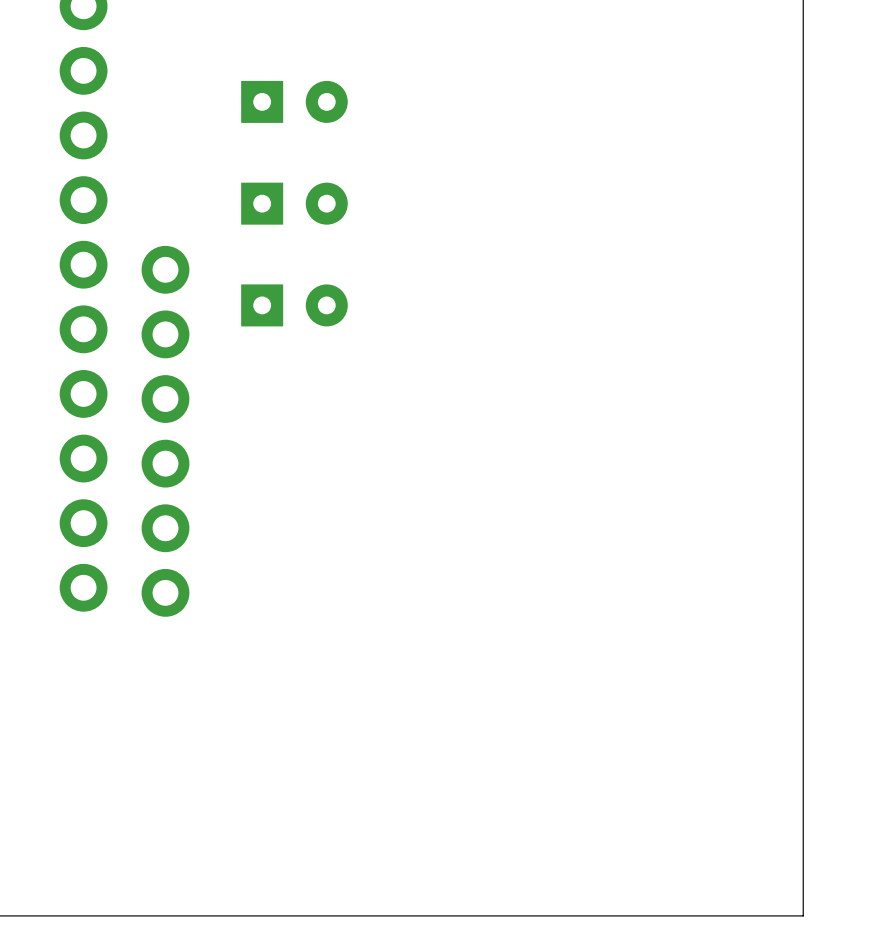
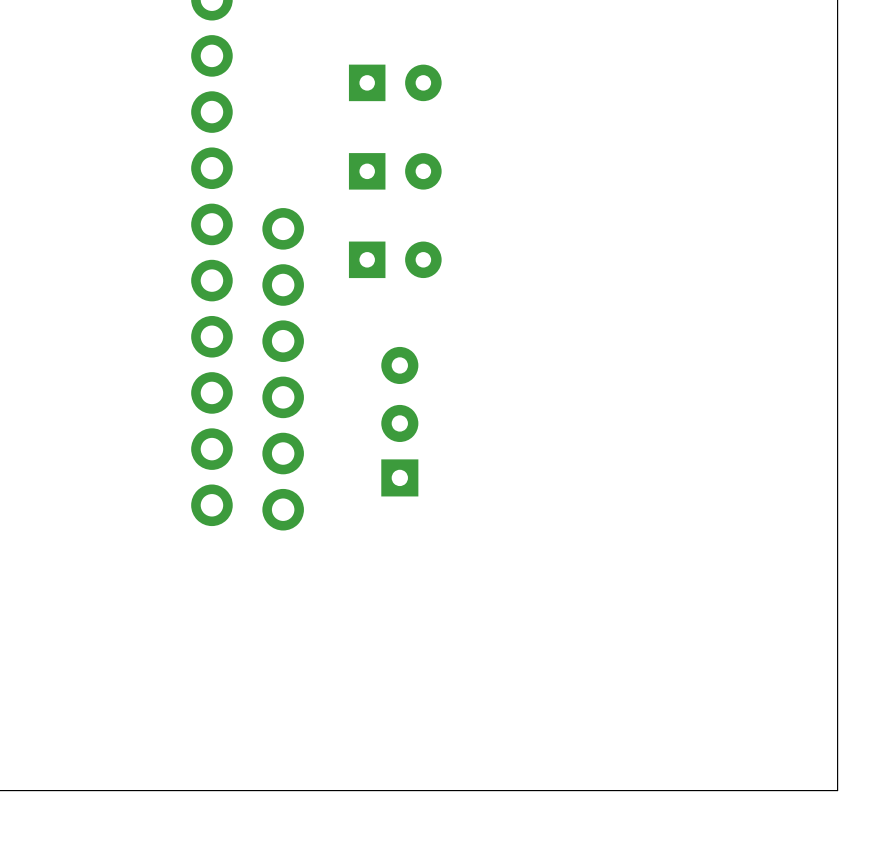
part: none -> (399, 421)

